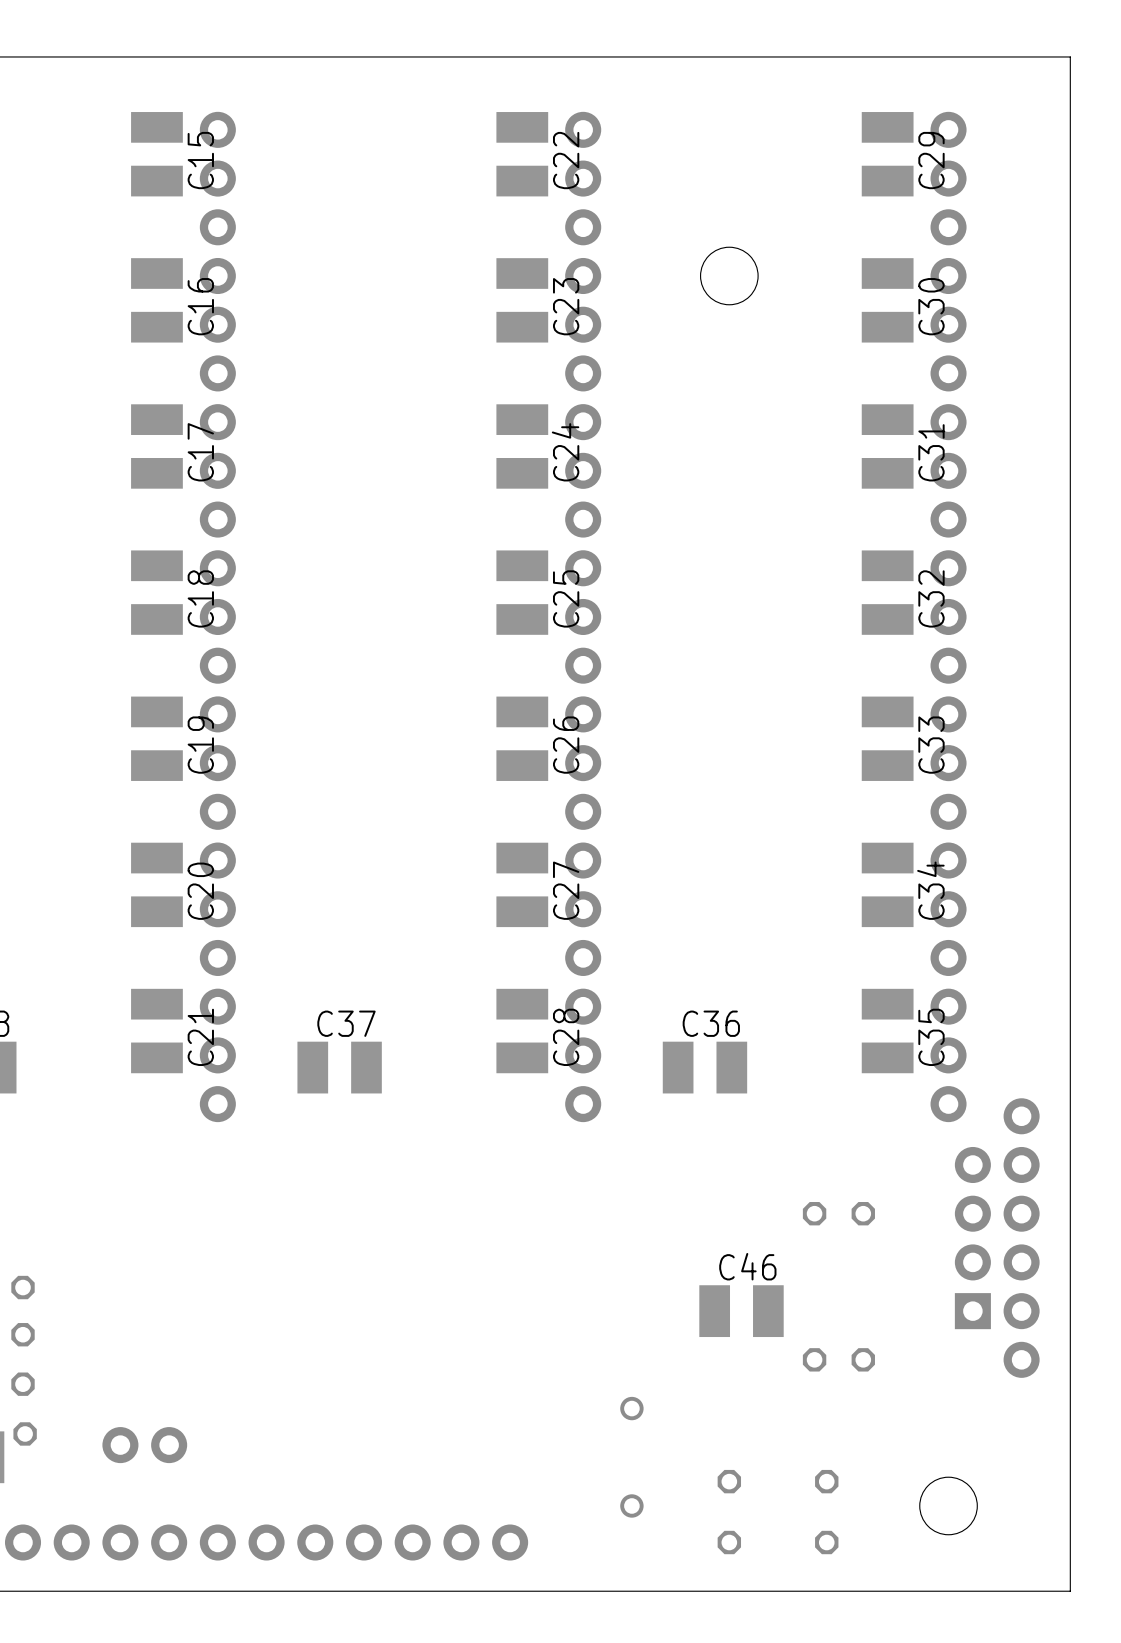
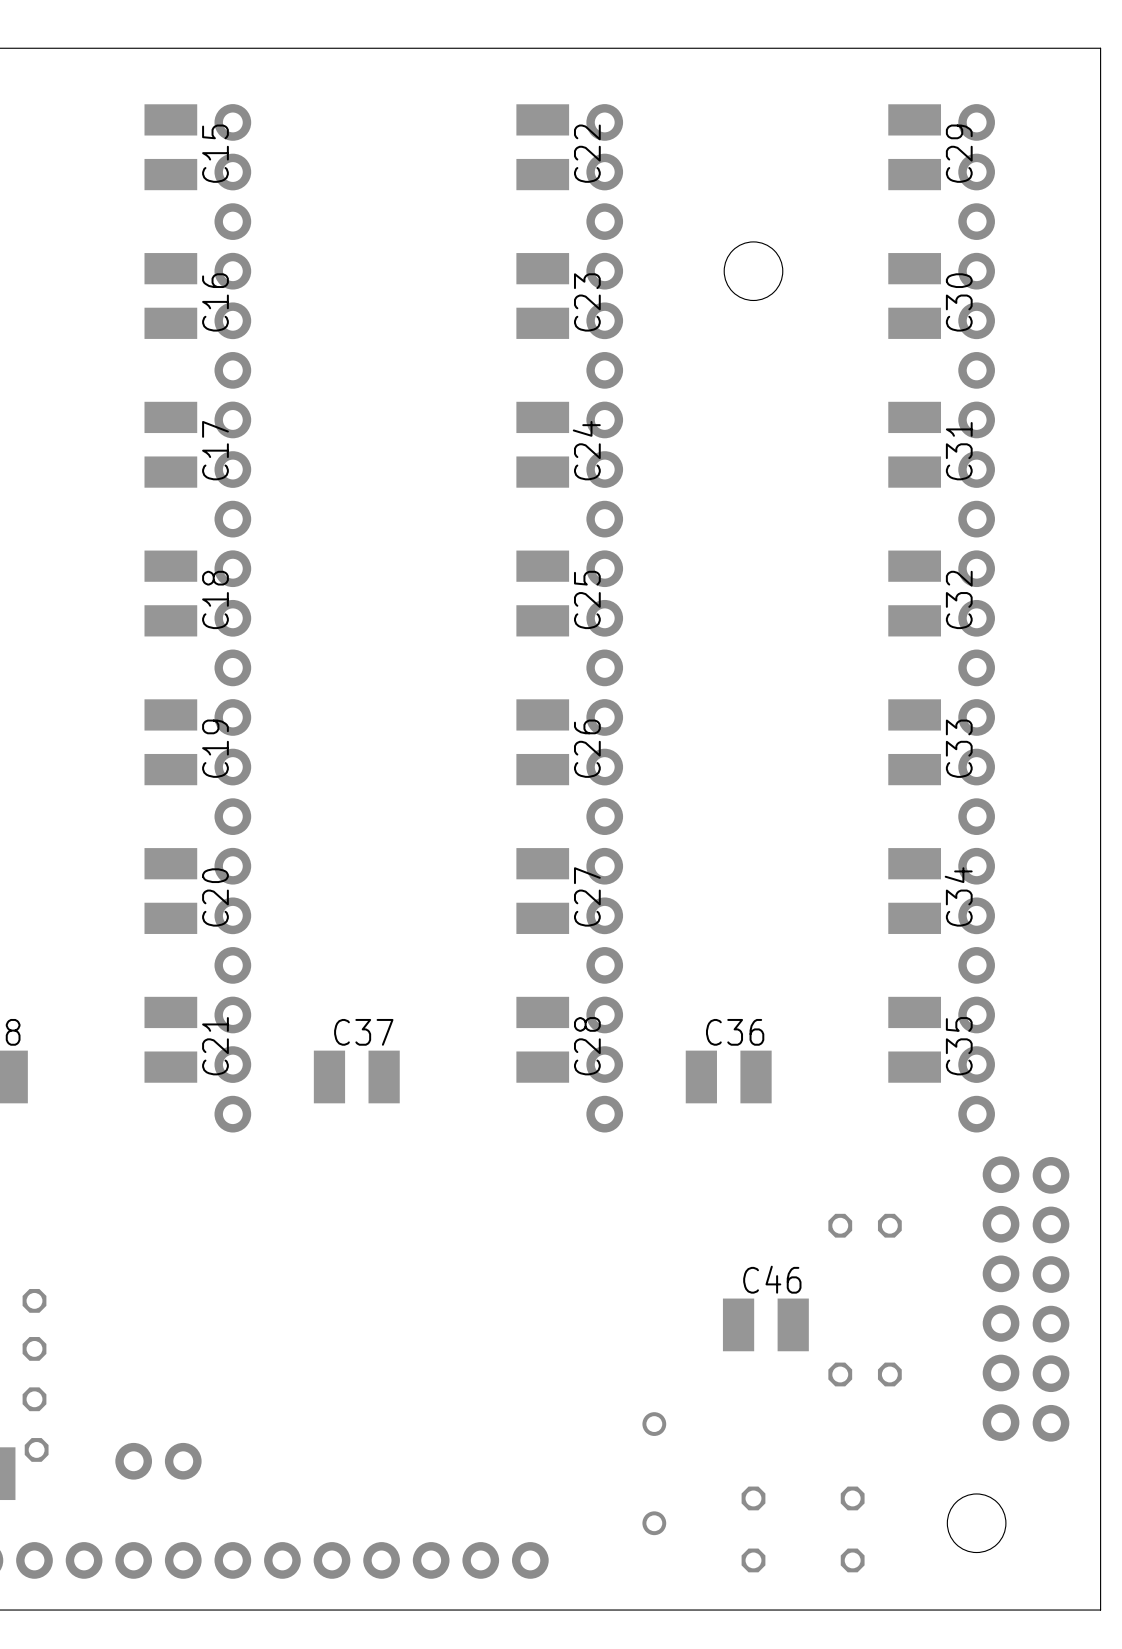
part: (972, 1238) -> none
part: (1021, 1238) -> none
part: none -> (1001, 1298)
part: none -> (1051, 1299)

